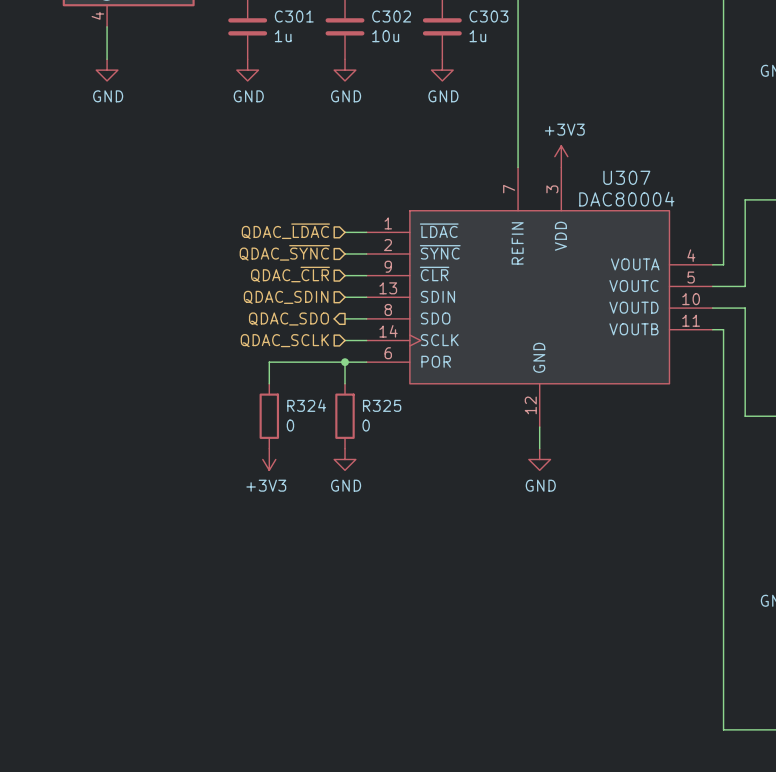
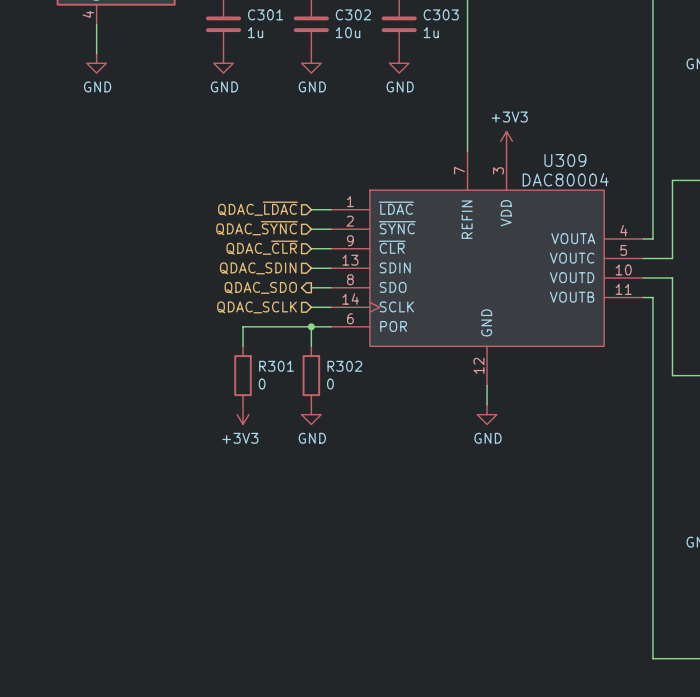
U307 name: U307 (626, 177) -> U309 (565, 160)
R324 name: R324 (306, 405) -> R301 (276, 366)
R325 name: R325 (382, 405) -> R302 (344, 366)

